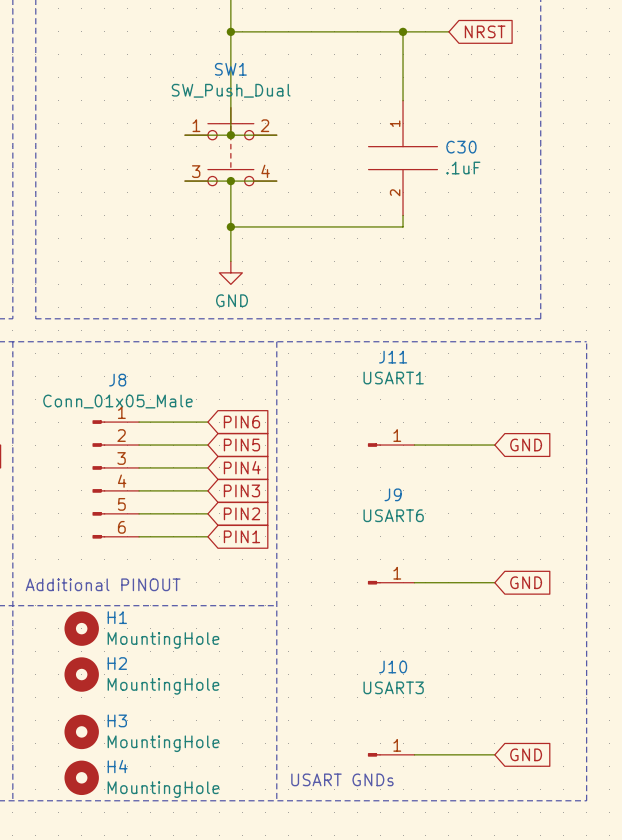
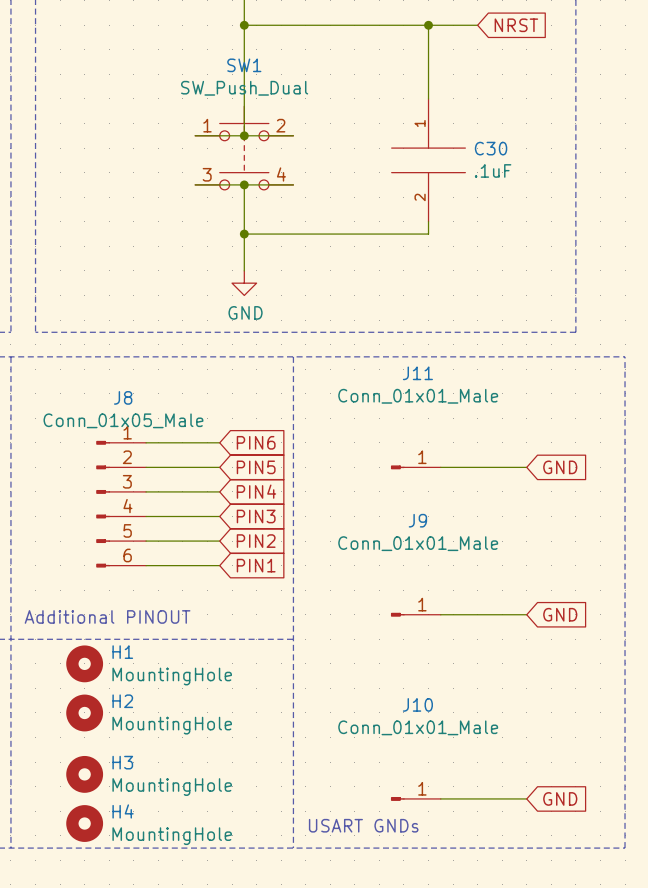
J11 value: USART1 (393, 378) -> Conn_01x01_Male (418, 396)
J9 value: USART6 (393, 515) -> Conn_01x01_Male (418, 543)
J10 value: USART3 (393, 687) -> Conn_01x01_Male (418, 727)

